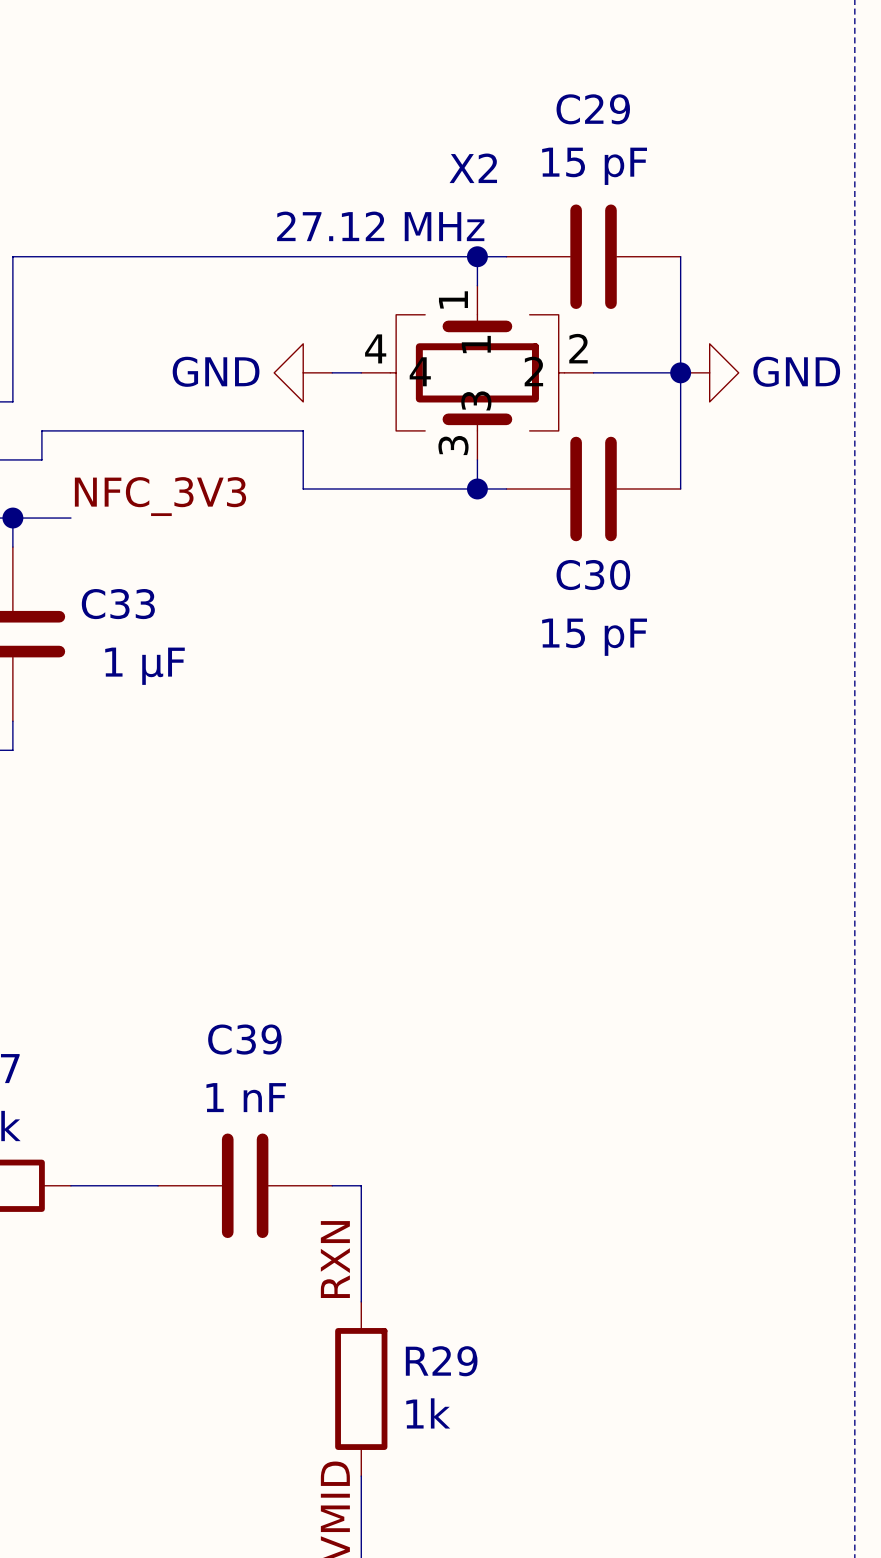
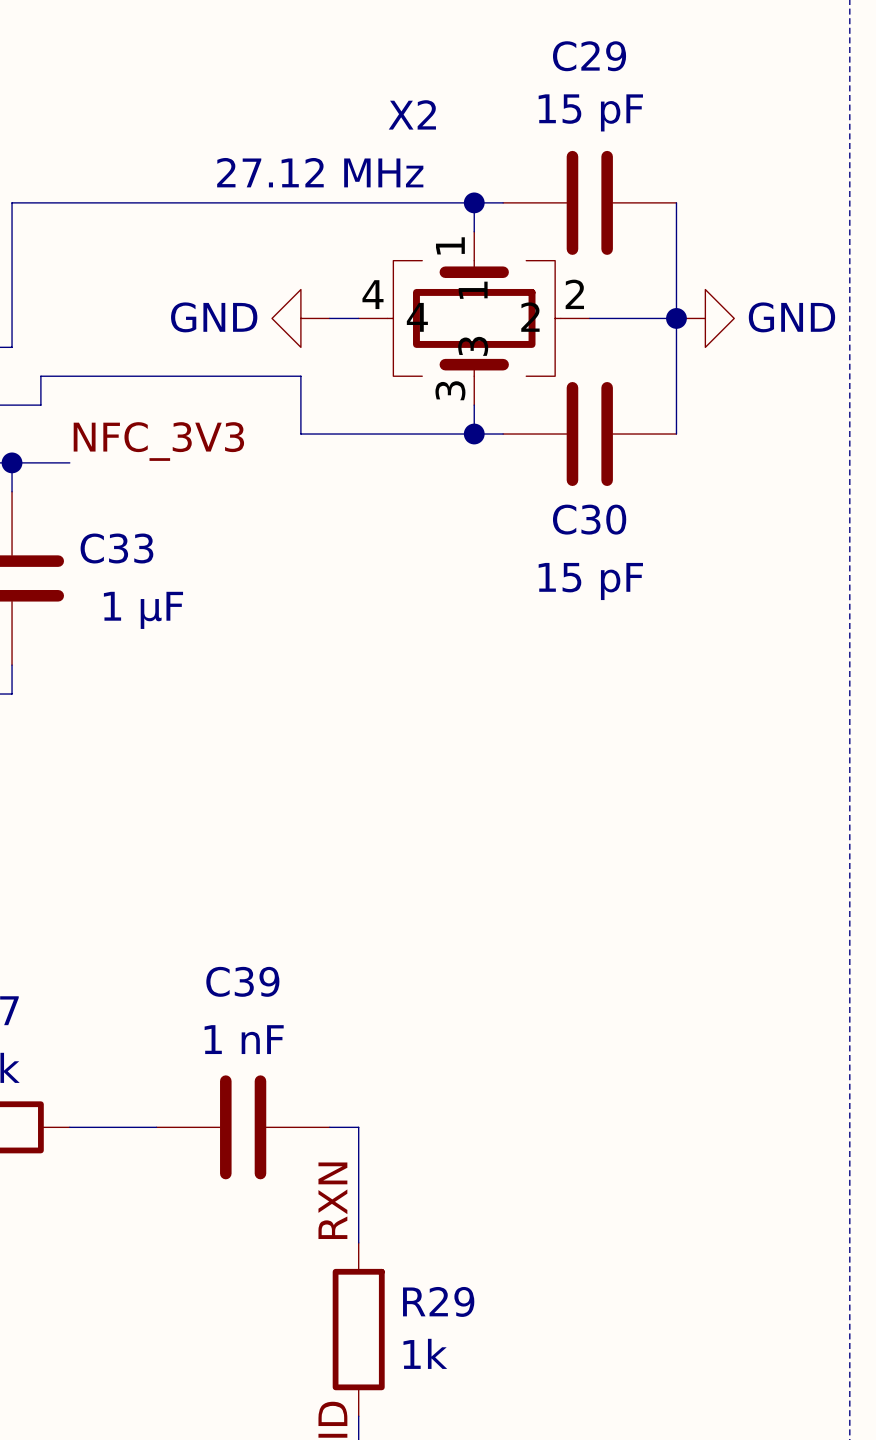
X2 name position: X2 (473, 168) -> X2 (412, 114)
X2 value position: 27.12 MHz (380, 226) -> 27.12 MHz (320, 172)

